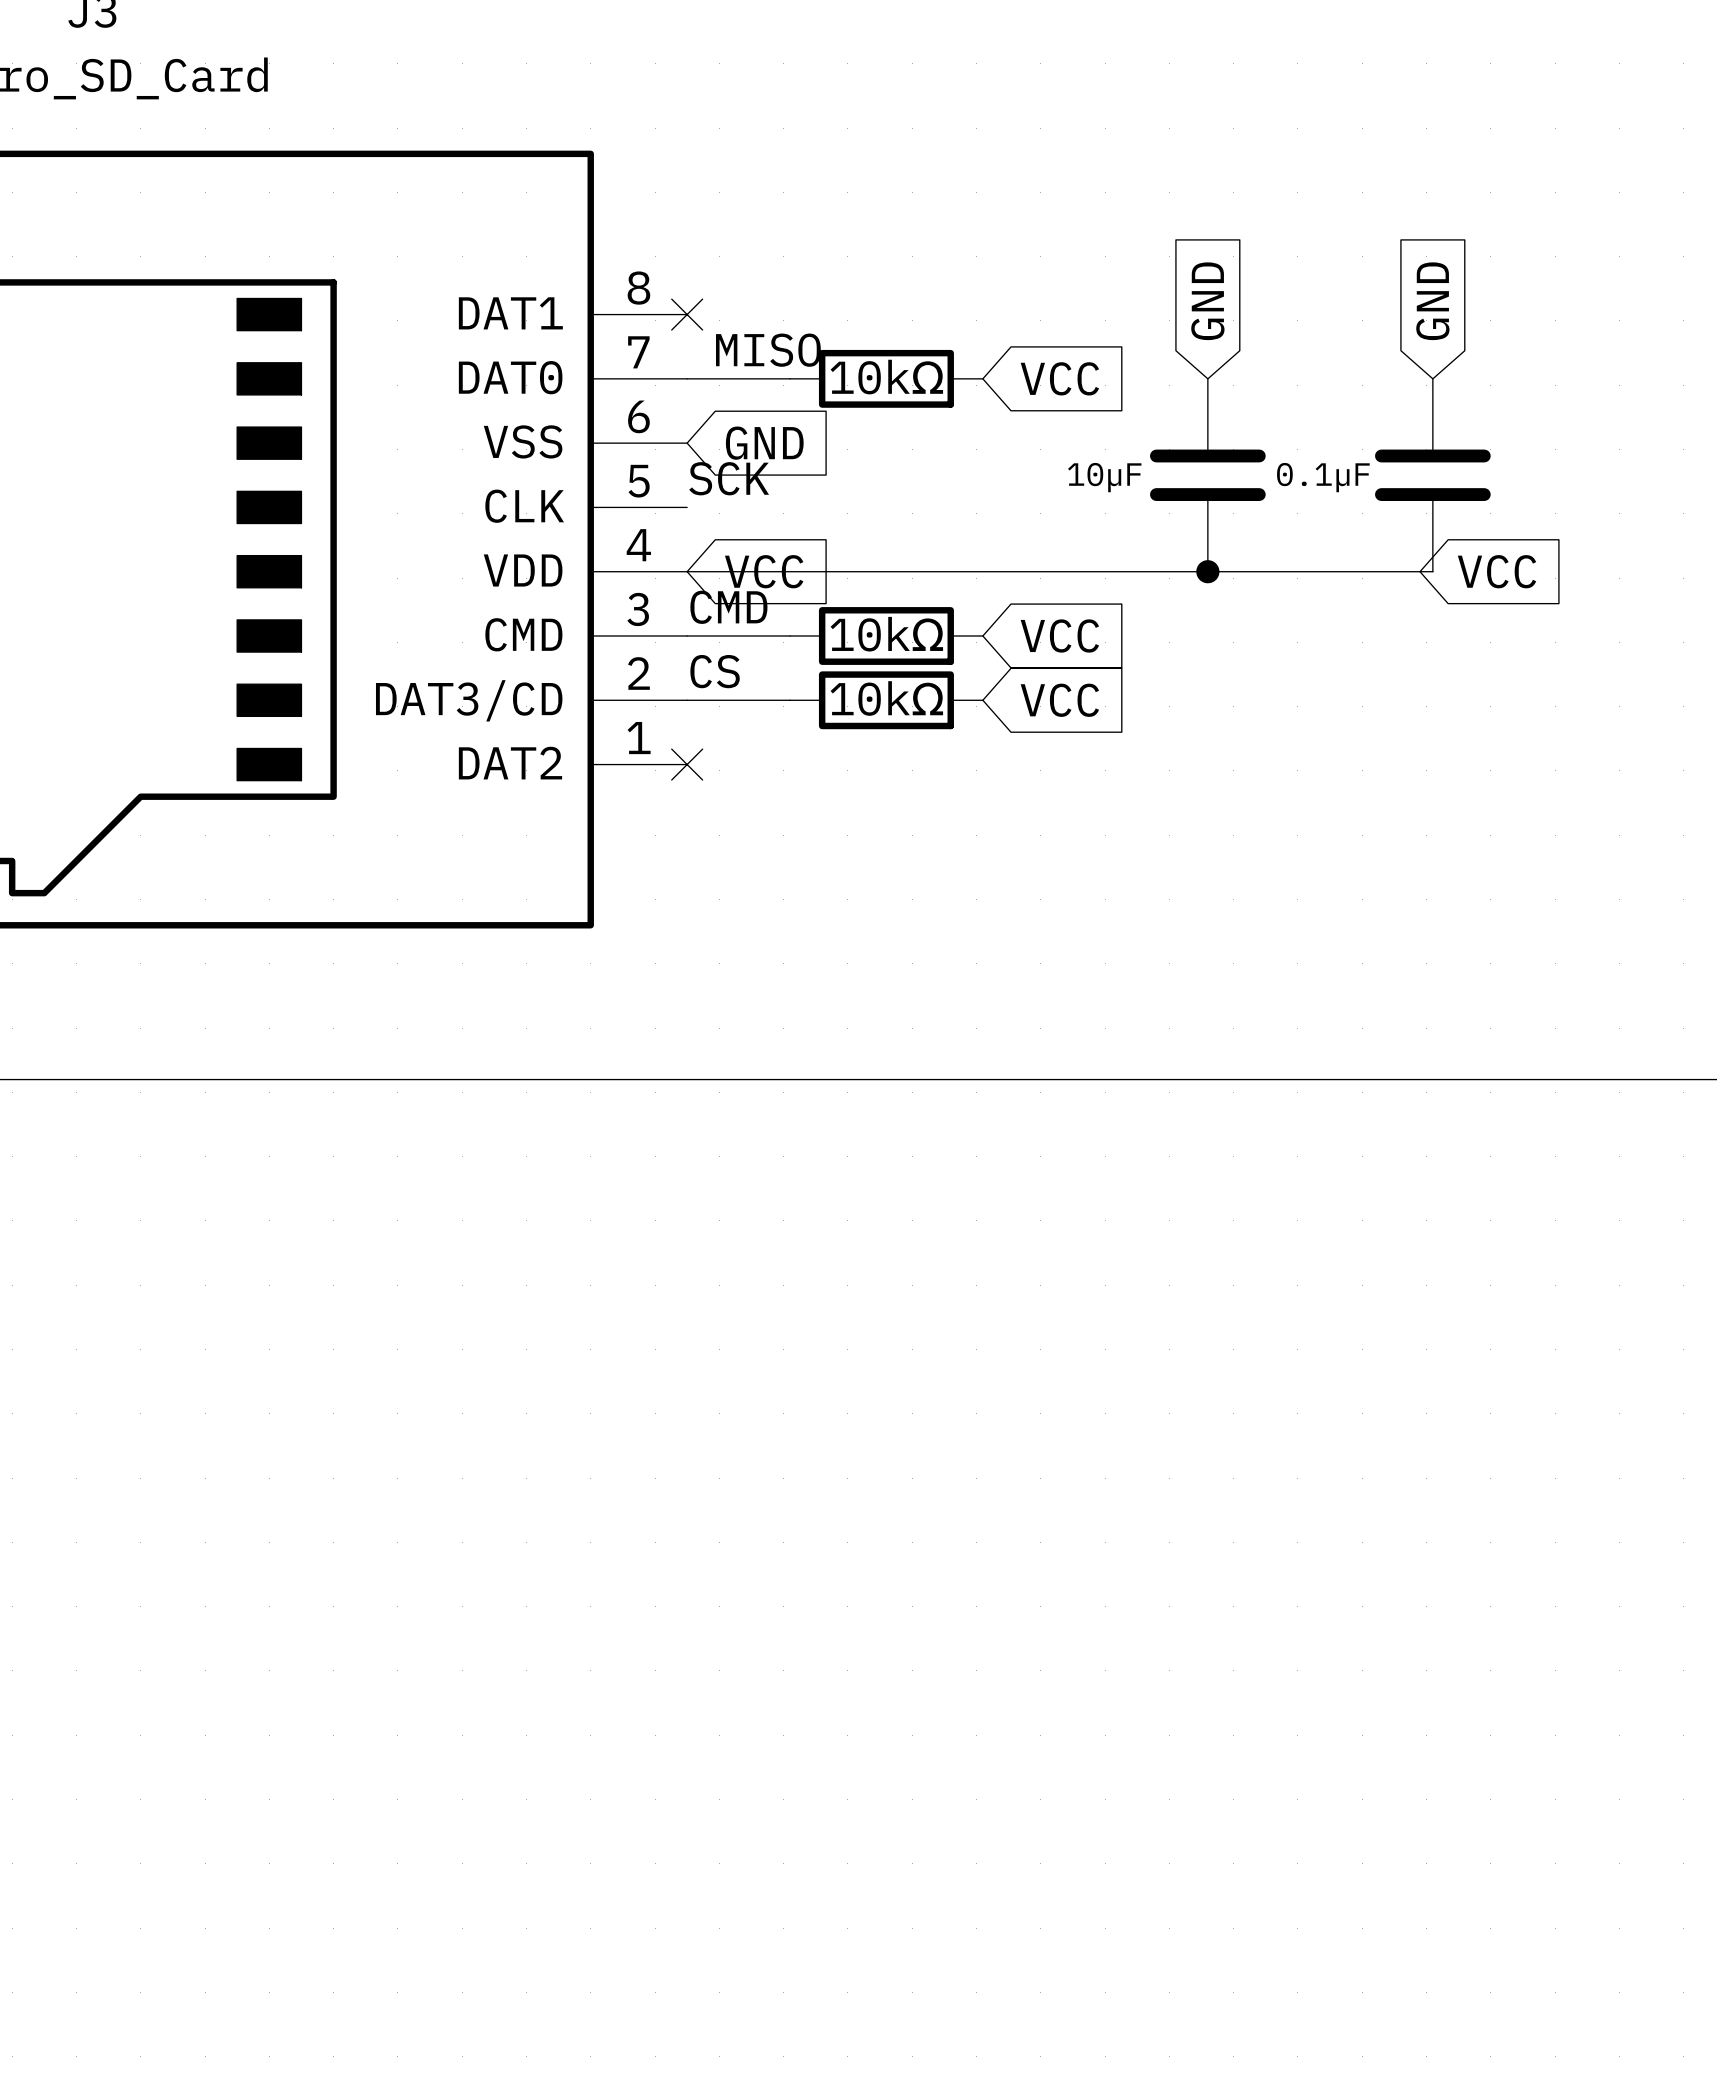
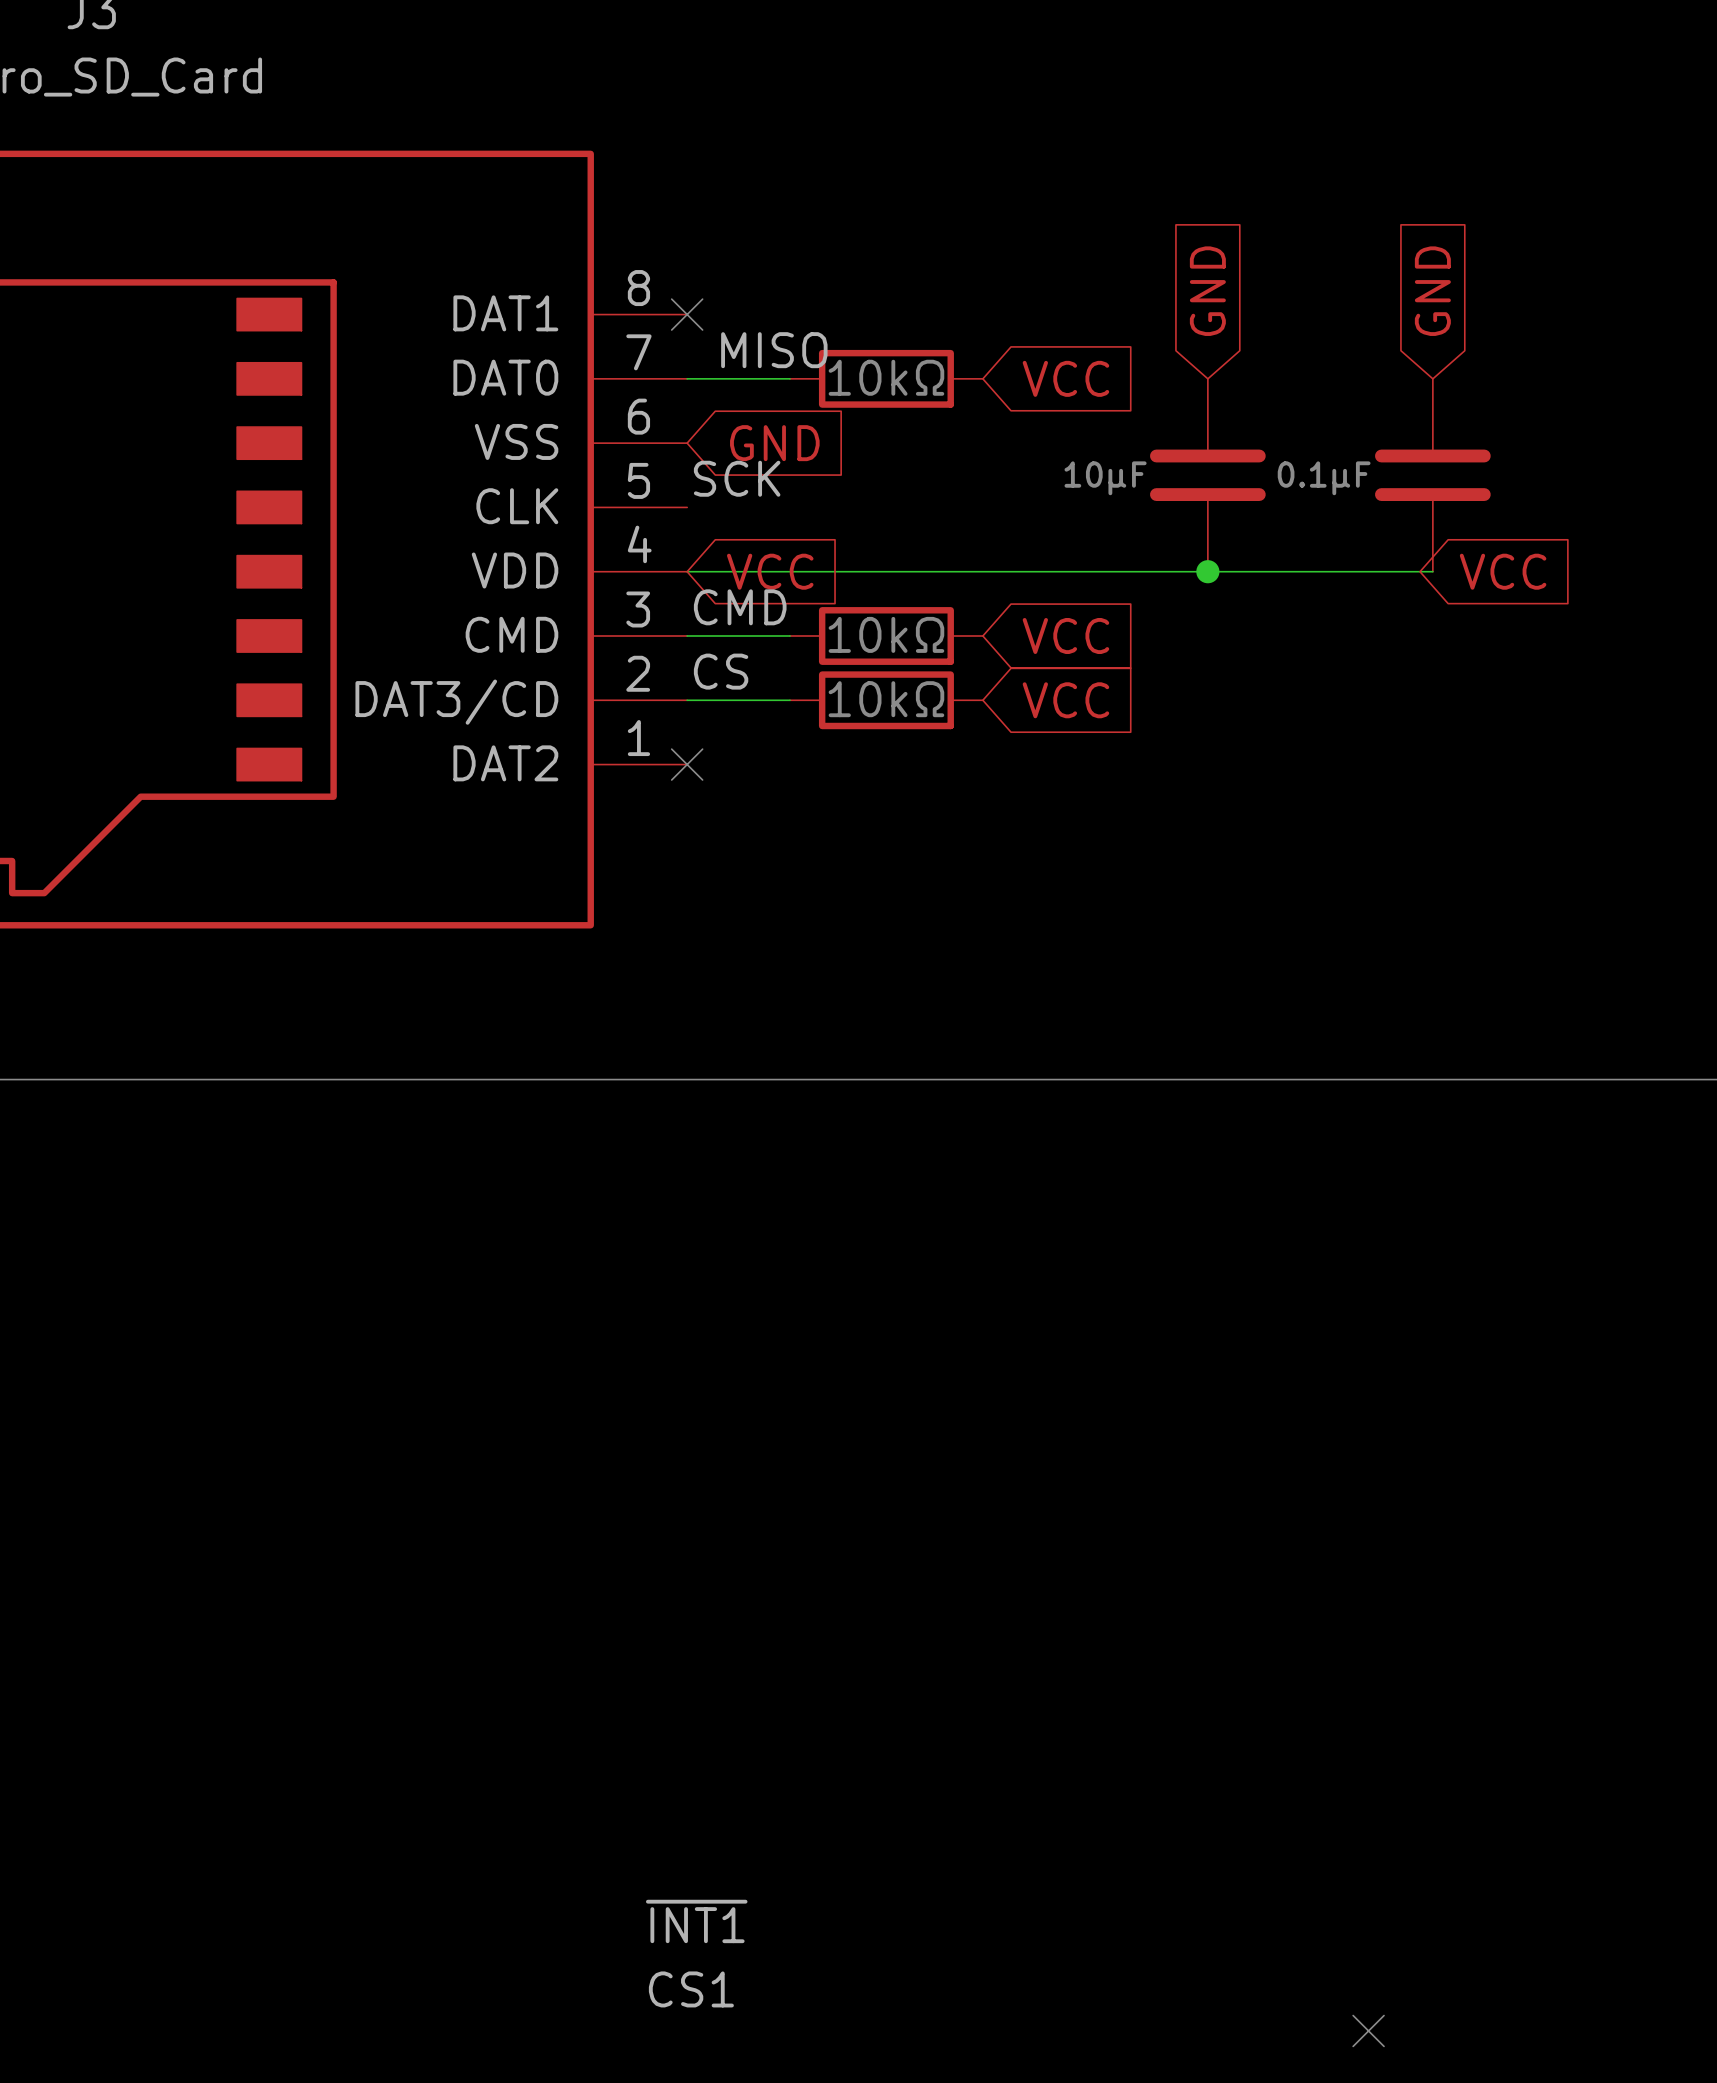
label: none -> ~{INT1} (696, 1921)
label: none -> CS1 (691, 1989)
no-connect mark: none -> (1368, 2030)

